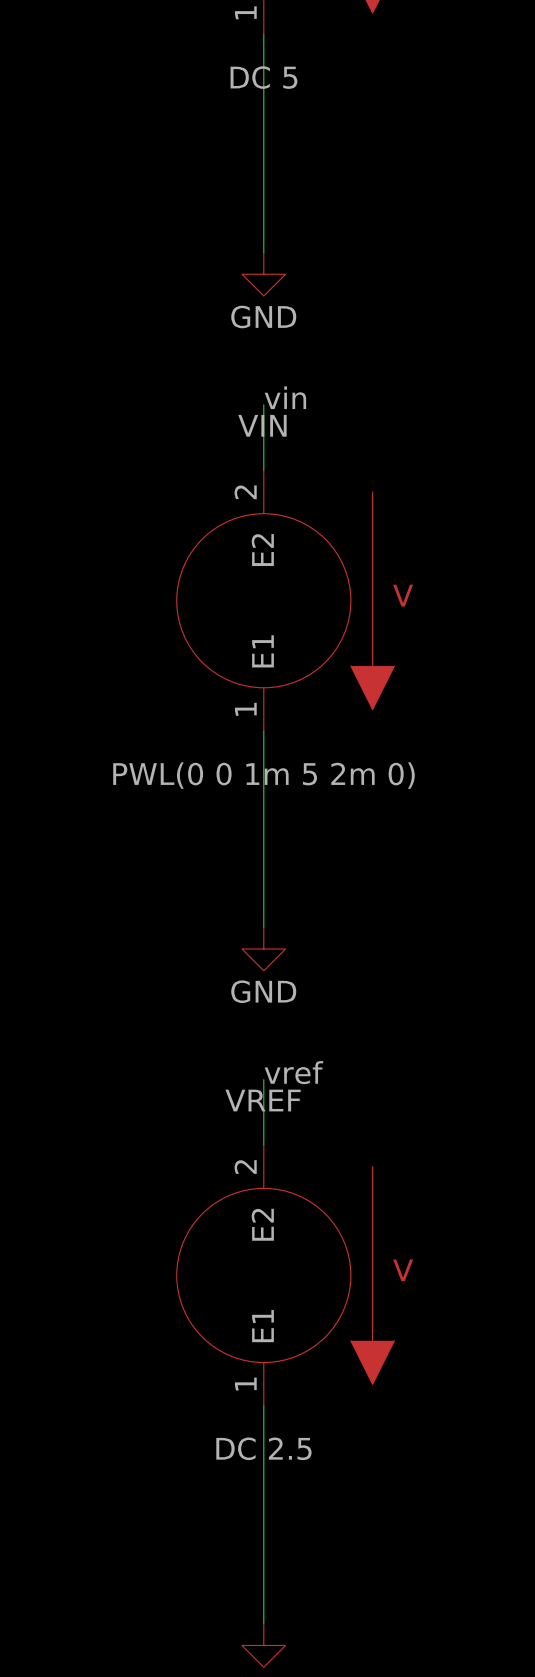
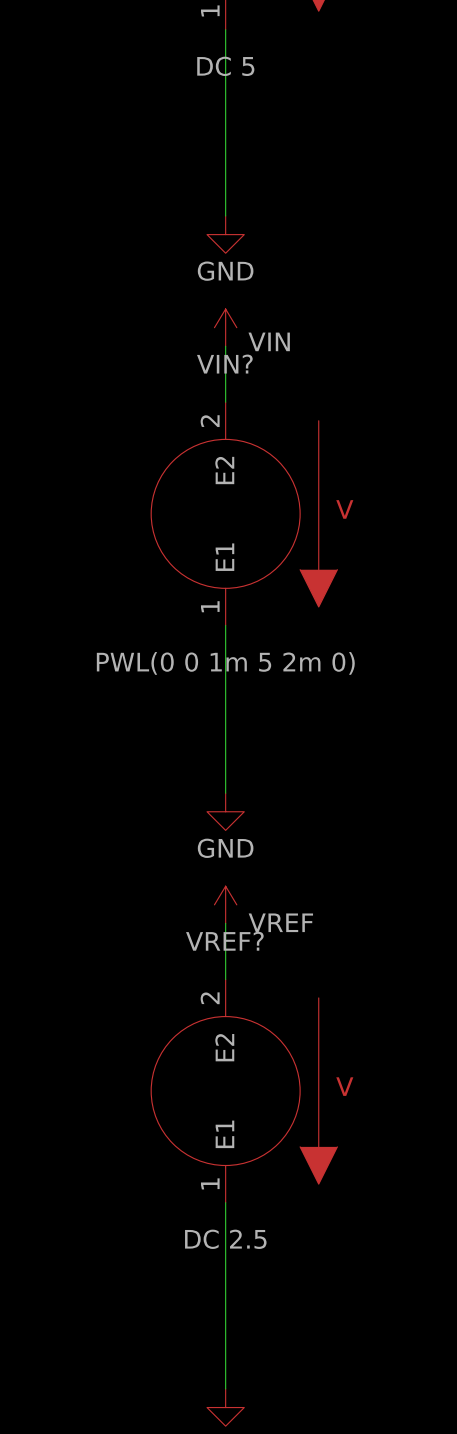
power symbol: none -> VIN (225, 327)
label: vin (285, 397) -> none
VIN name: VIN (262, 425) -> VIN? (224, 364)
power symbol: none -> VREF (225, 904)
label: vref (293, 1072) -> none
VREF name: VREF (263, 1100) -> VREF? (224, 941)

